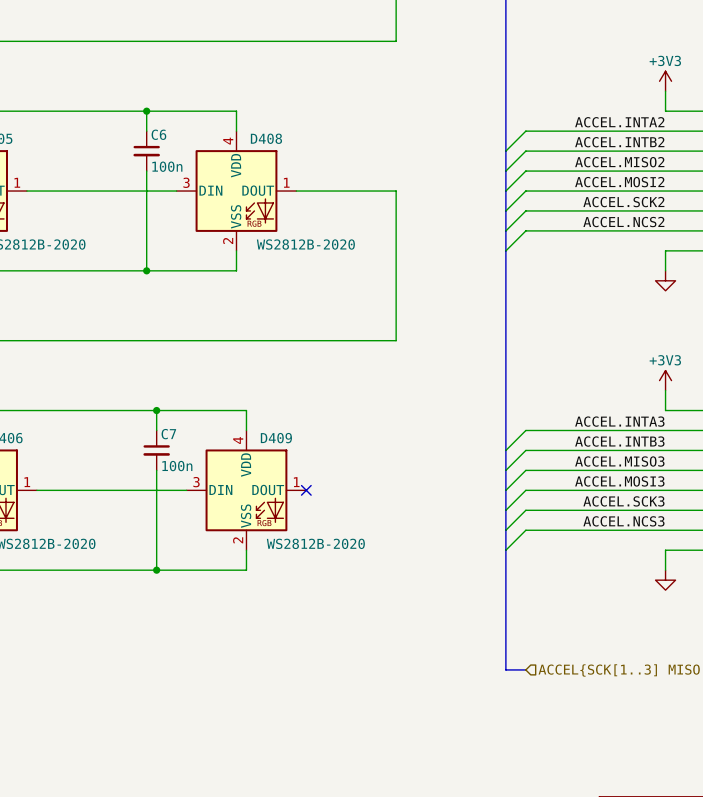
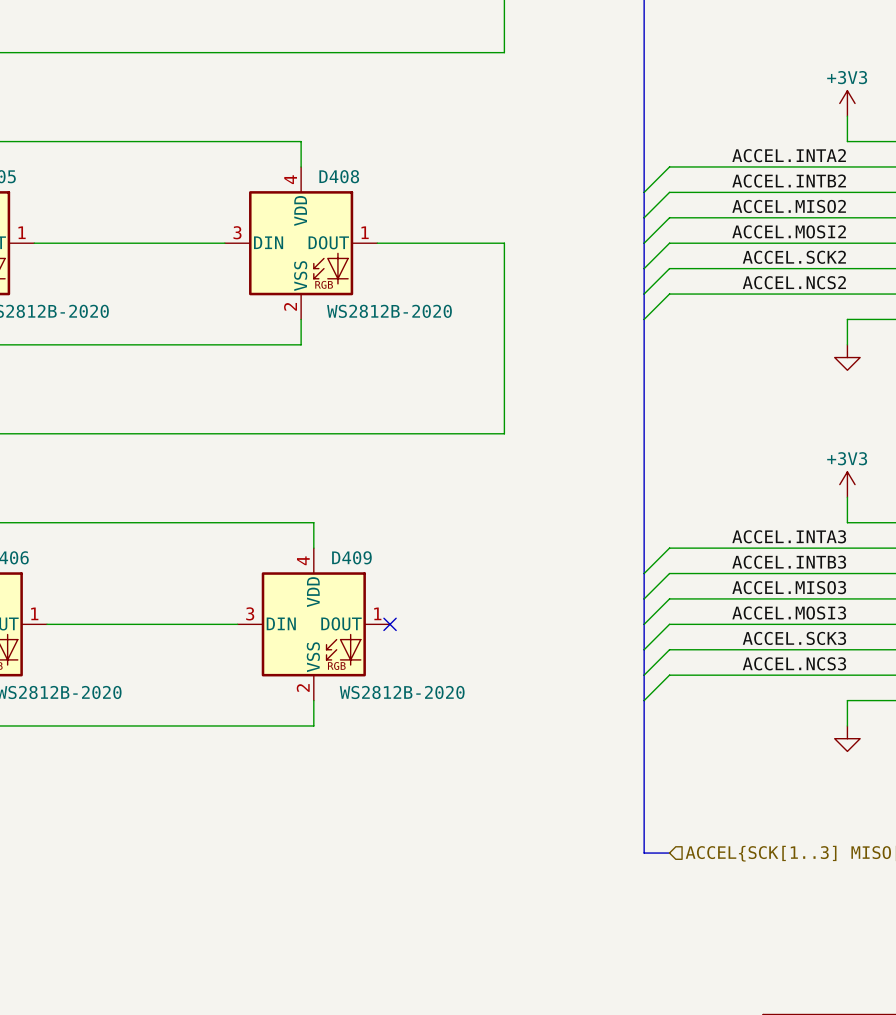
wire: (146, 111) (146, 131) -> none
junction: (146, 111) -> none
C6: 100n (146, 151) -> none
wire: (146, 171) (146, 270) -> none
junction: (146, 270) -> none
wire: (156, 410) (156, 430) -> none
junction: (156, 410) -> none
C7: 100n (156, 450) -> none
wire: (156, 470) (156, 570) -> none
junction: (156, 570) -> none

